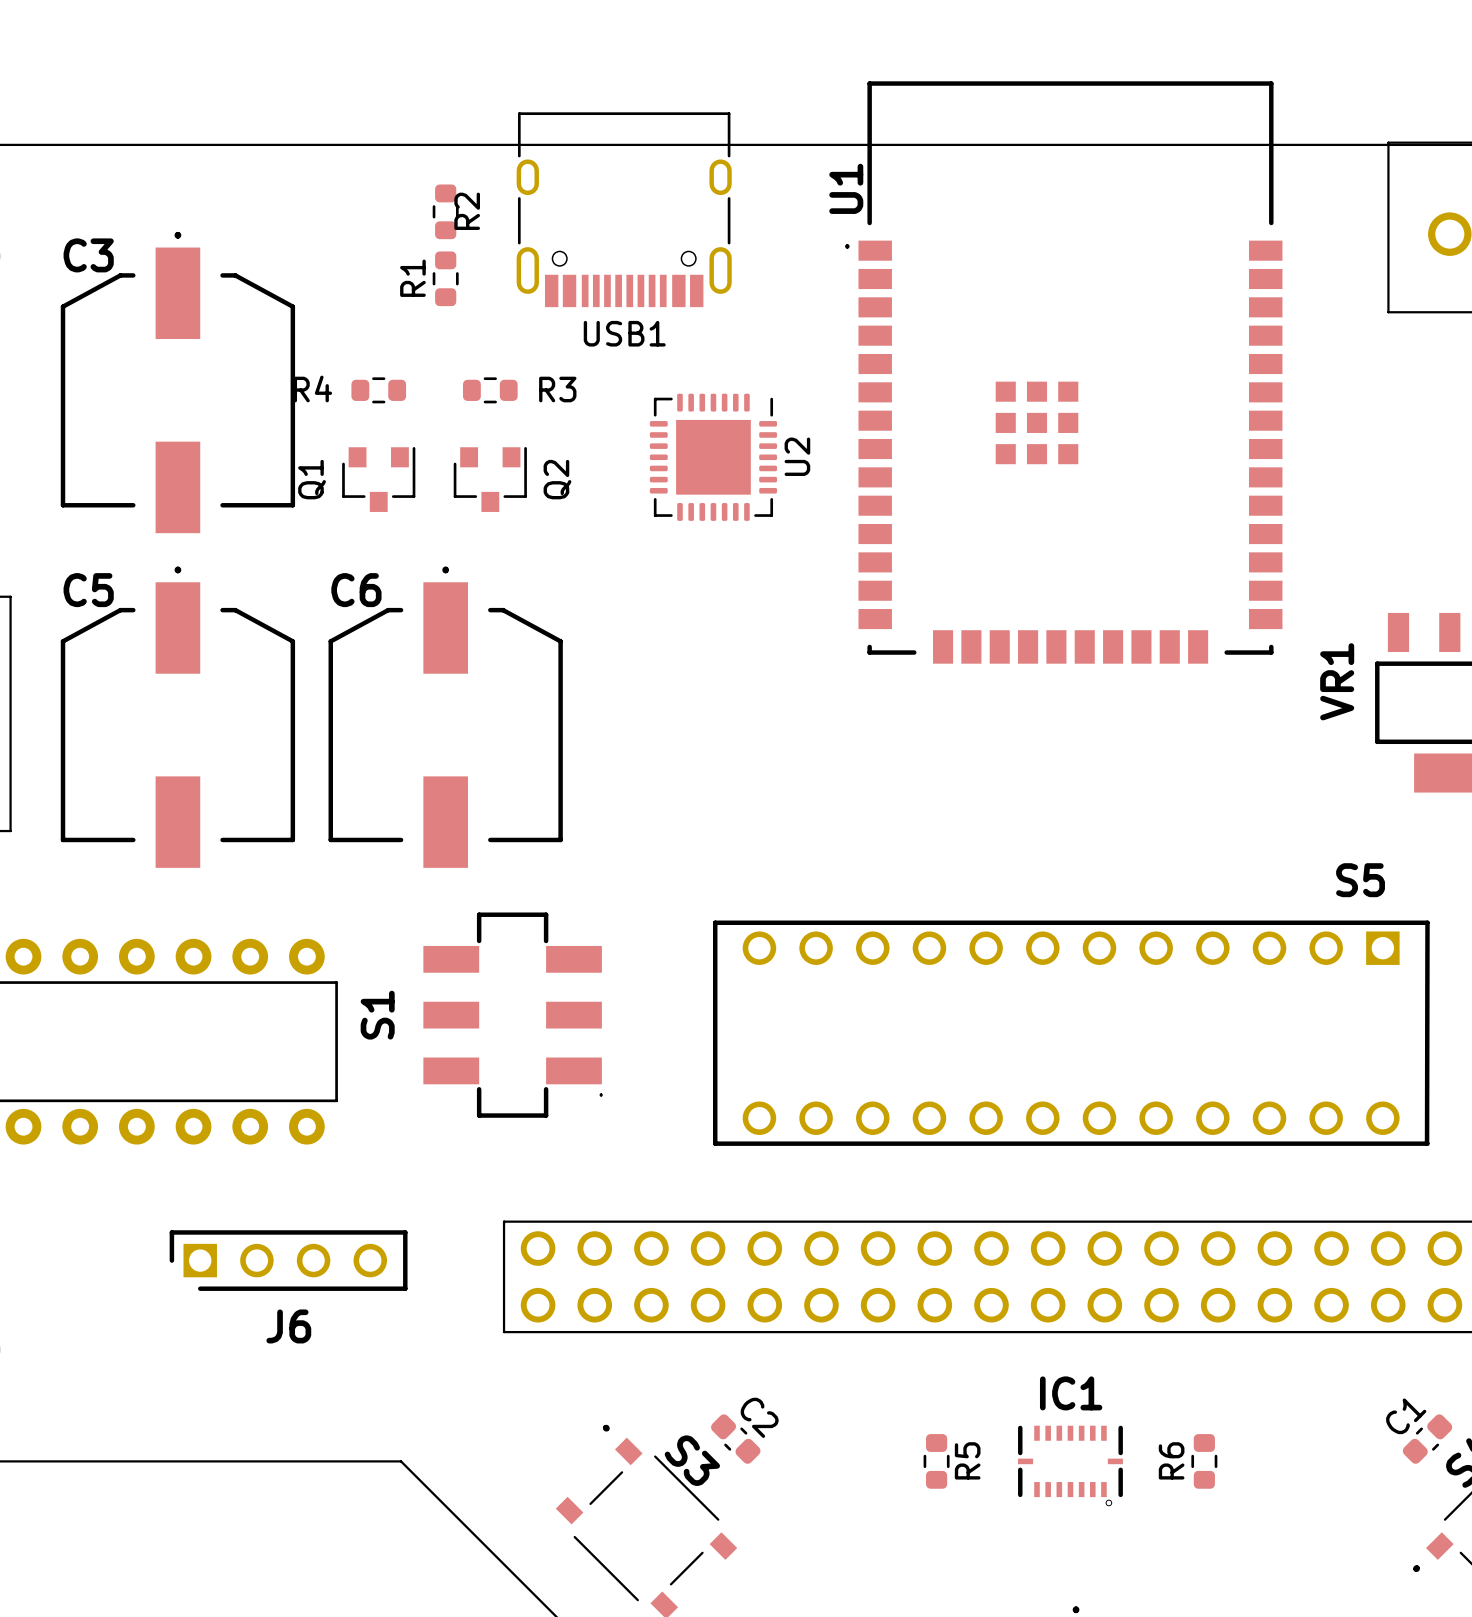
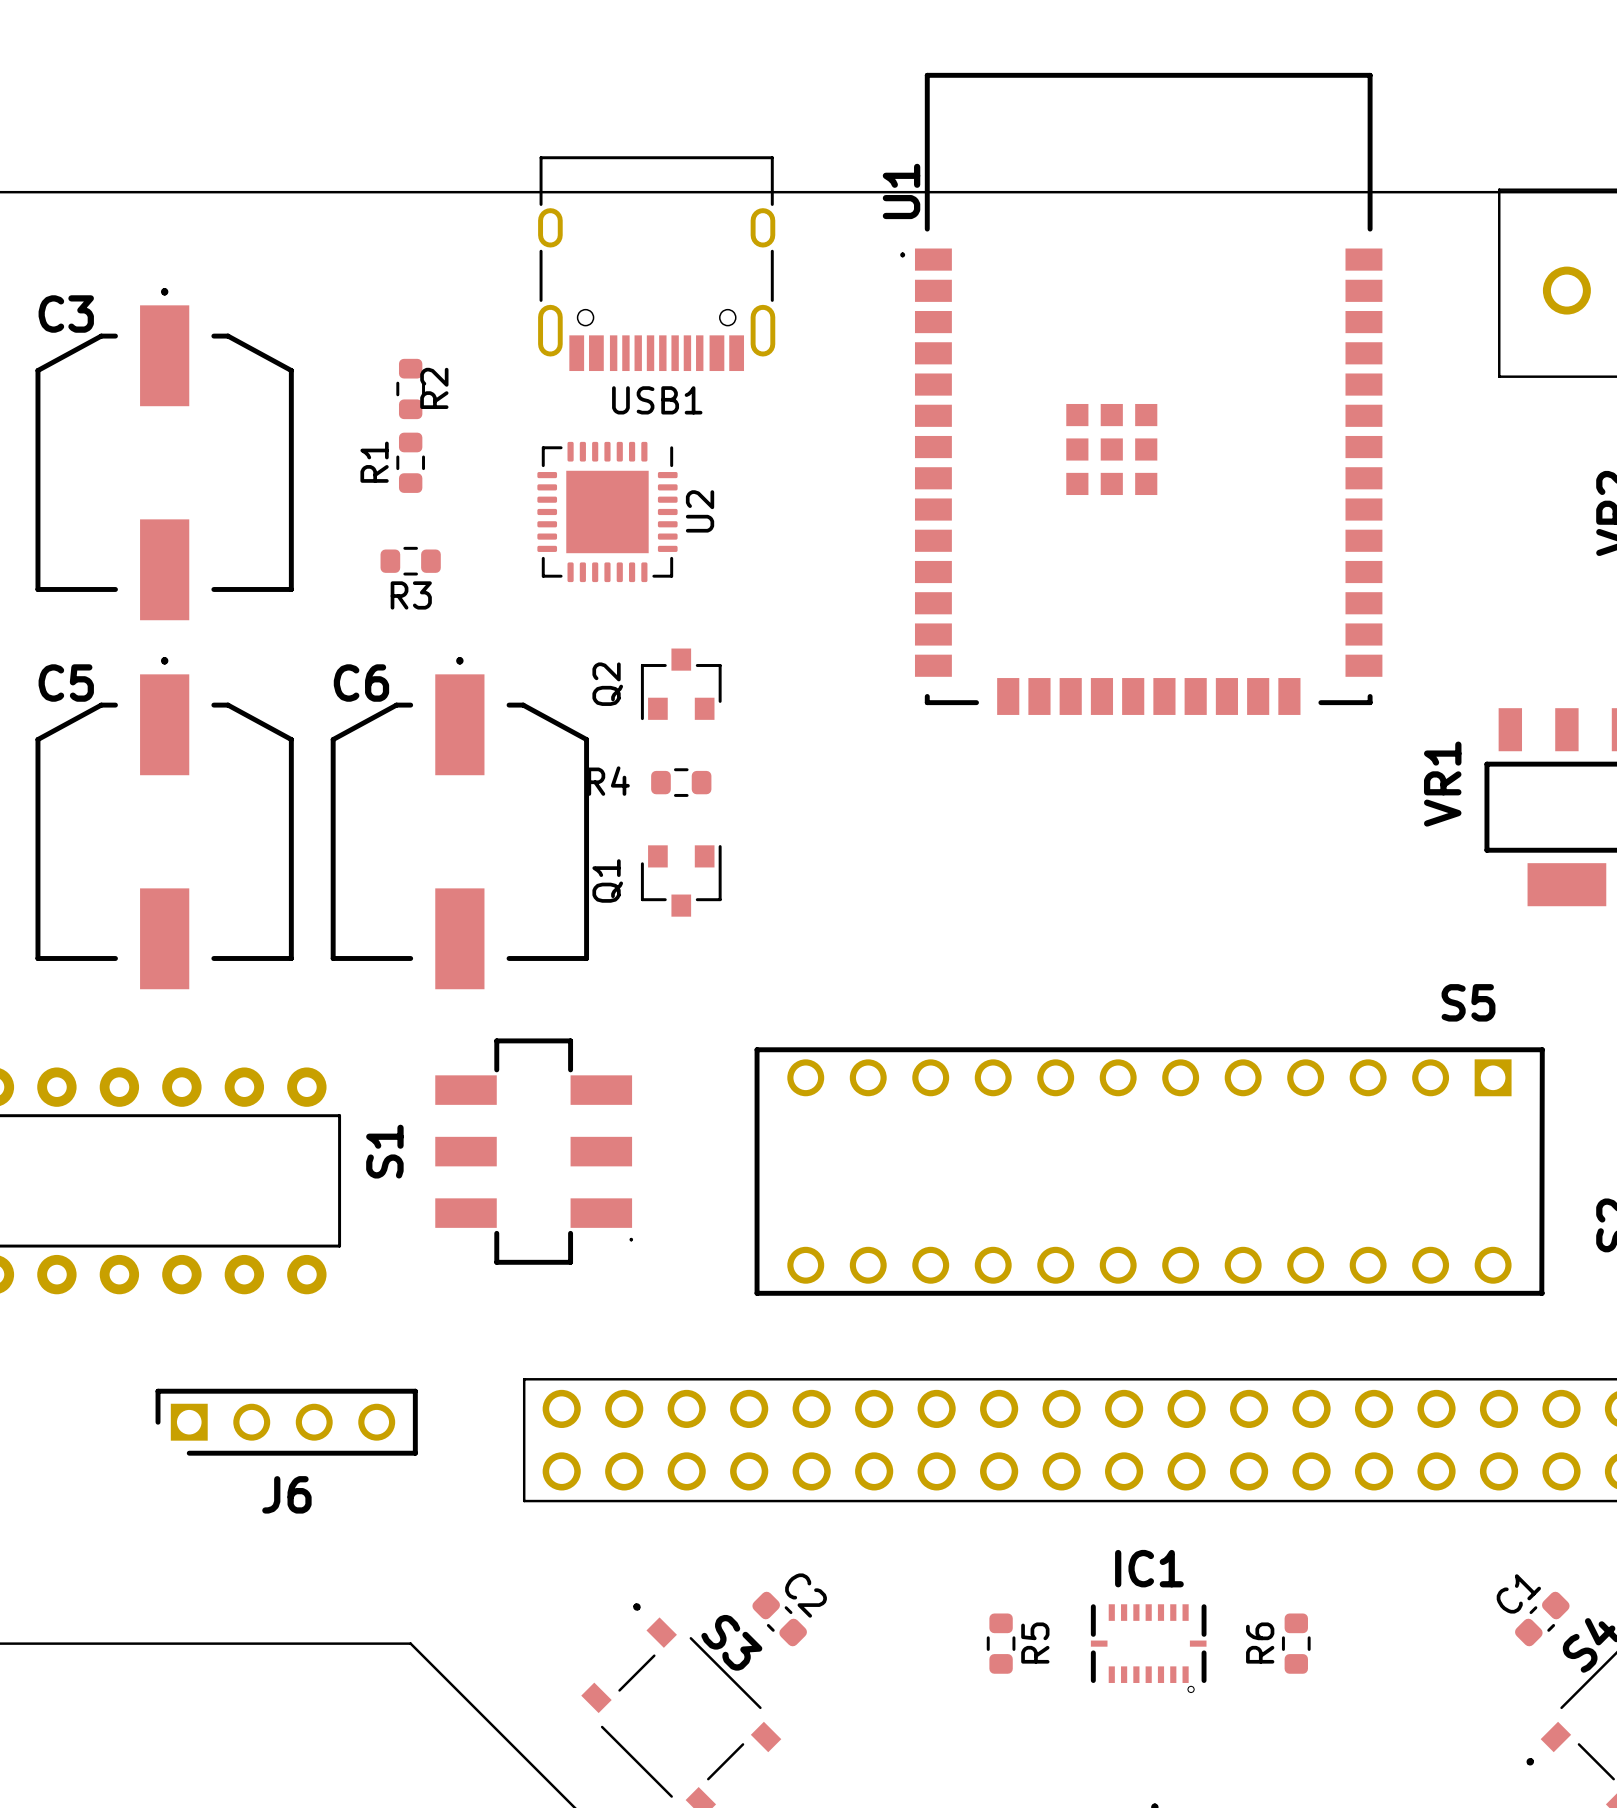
R2 position: (445, 211) -> (410, 388)
R1 position: (445, 278) -> (410, 462)
U1 position: (1063, 372) -> (1141, 393)
R3 name position: R3 (557, 389) -> R3 (411, 595)
R4 position: (378, 390) -> (681, 782)
R3 position: (490, 390) -> (410, 561)
U2 position: (713, 457) -> (607, 511)
Q1 position: (378, 479) -> (681, 880)
Q2 rotation: 0° (490, 479) -> 180° (681, 684)
Q2 position: (490, 479) -> (681, 684)

